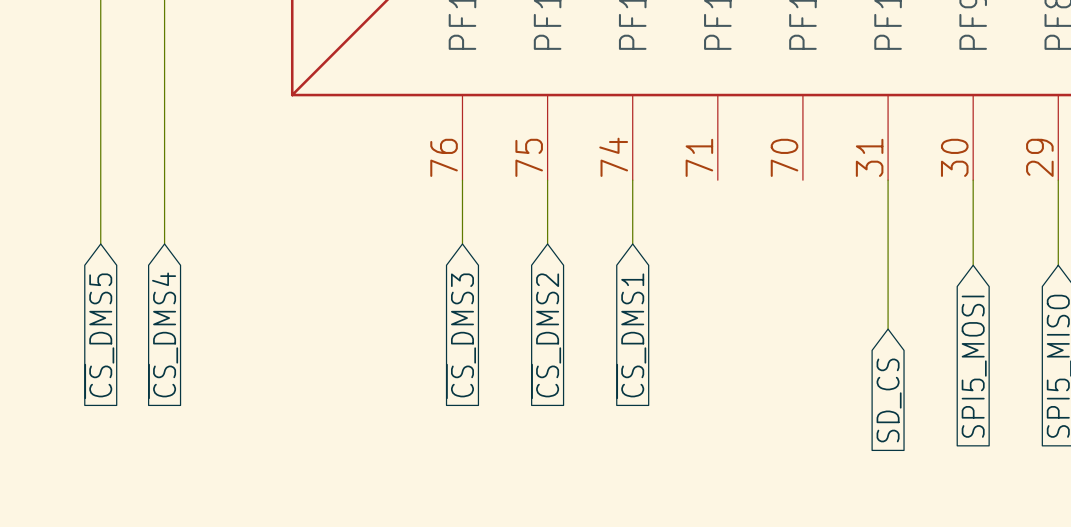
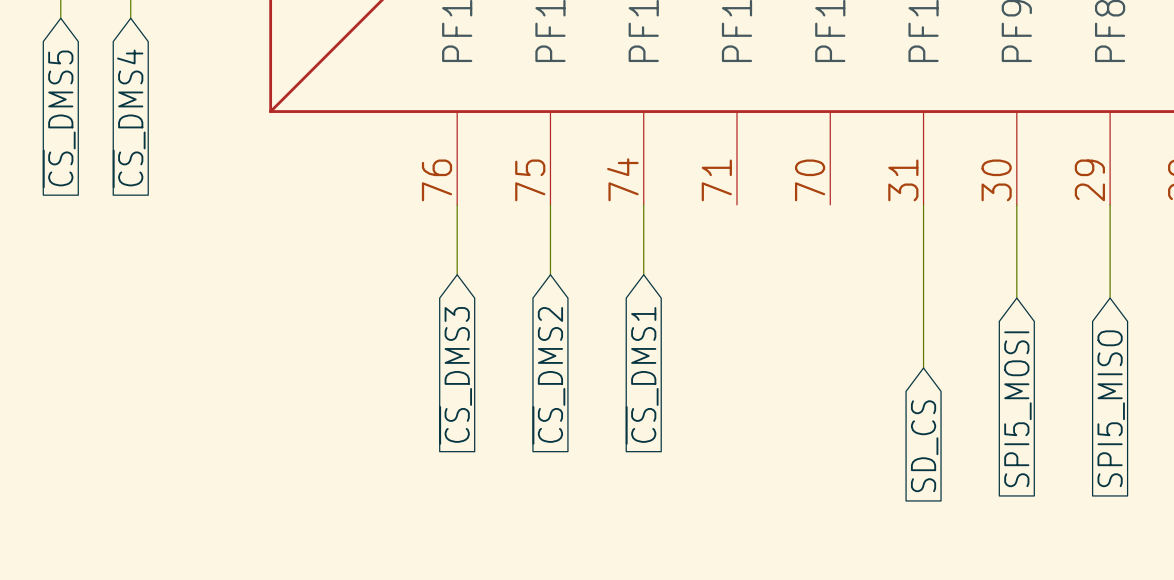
wire: (100, 9) (100, 243) -> none
wire: (164, 9) (164, 243) -> none
global label position: ~{CS}_DMS4 (163, 335) -> ~{CS}_DMS4 (129, 118)
global label position: ~{CS}_DMS5 (99, 336) -> ~{CS}_DMS5 (59, 119)

